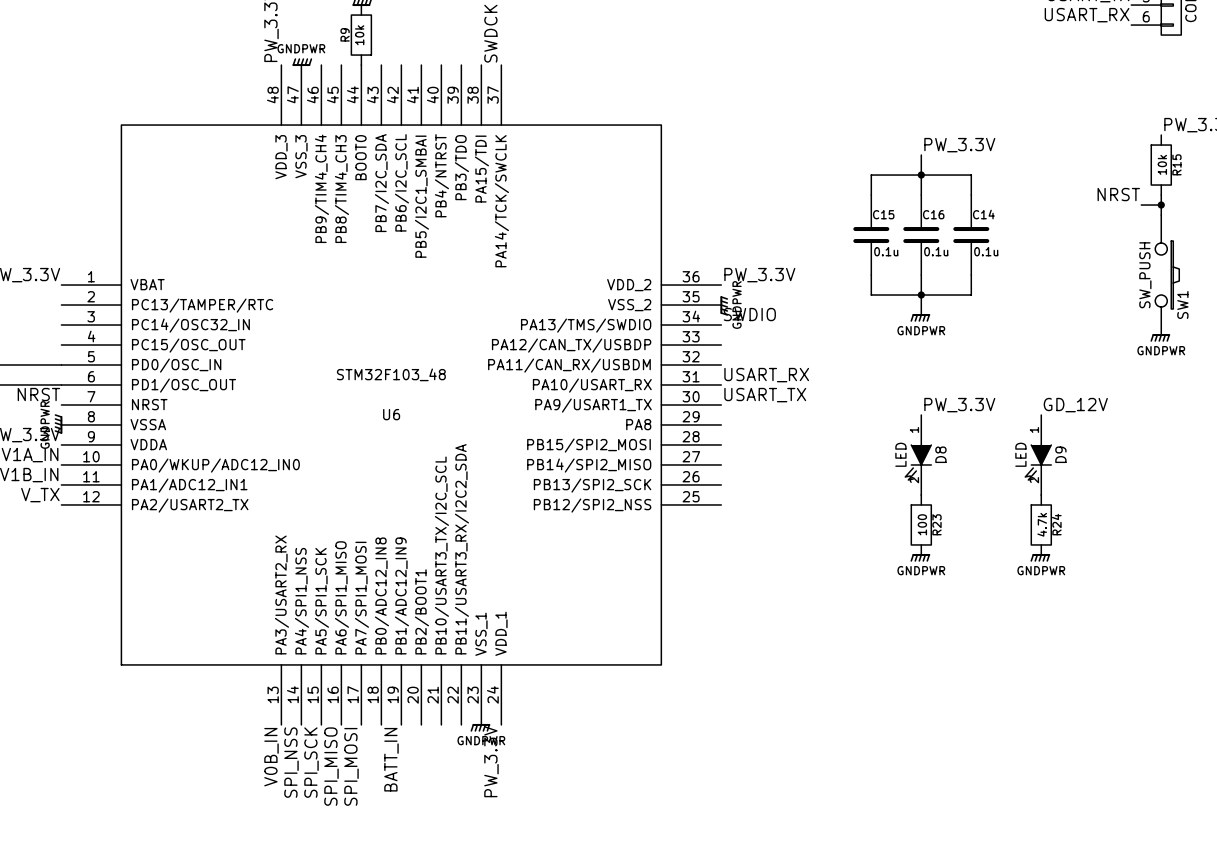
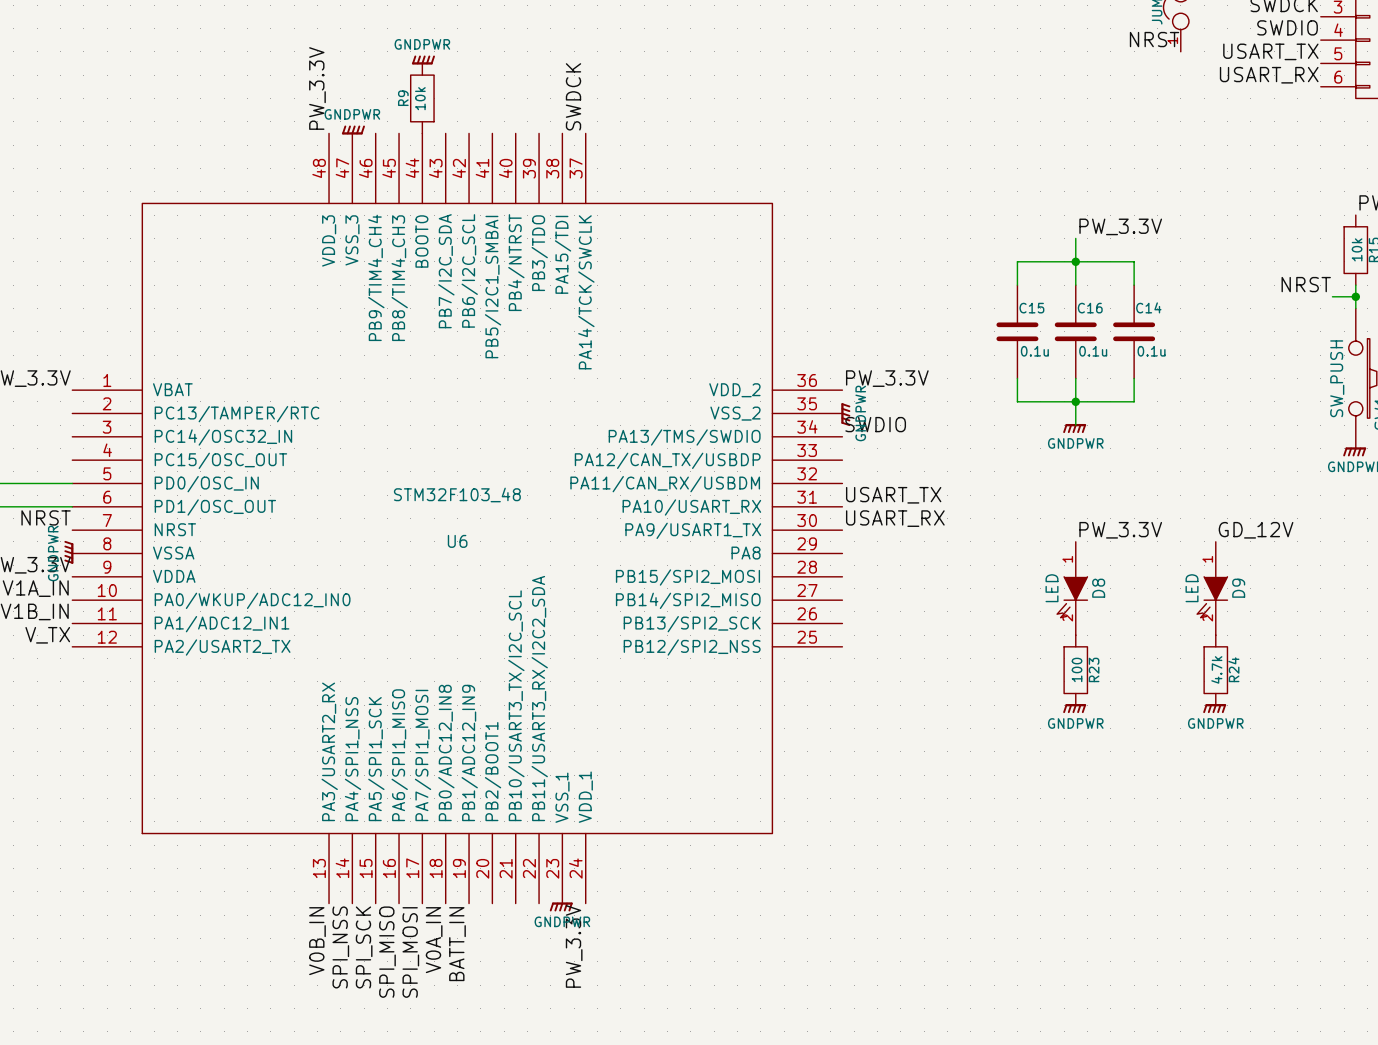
label: USART_RX (766, 375) -> USART_TX (893, 495)
label: USART_TX (765, 395) -> USART_RX (895, 518)
label: none -> V0A_IN (434, 940)

